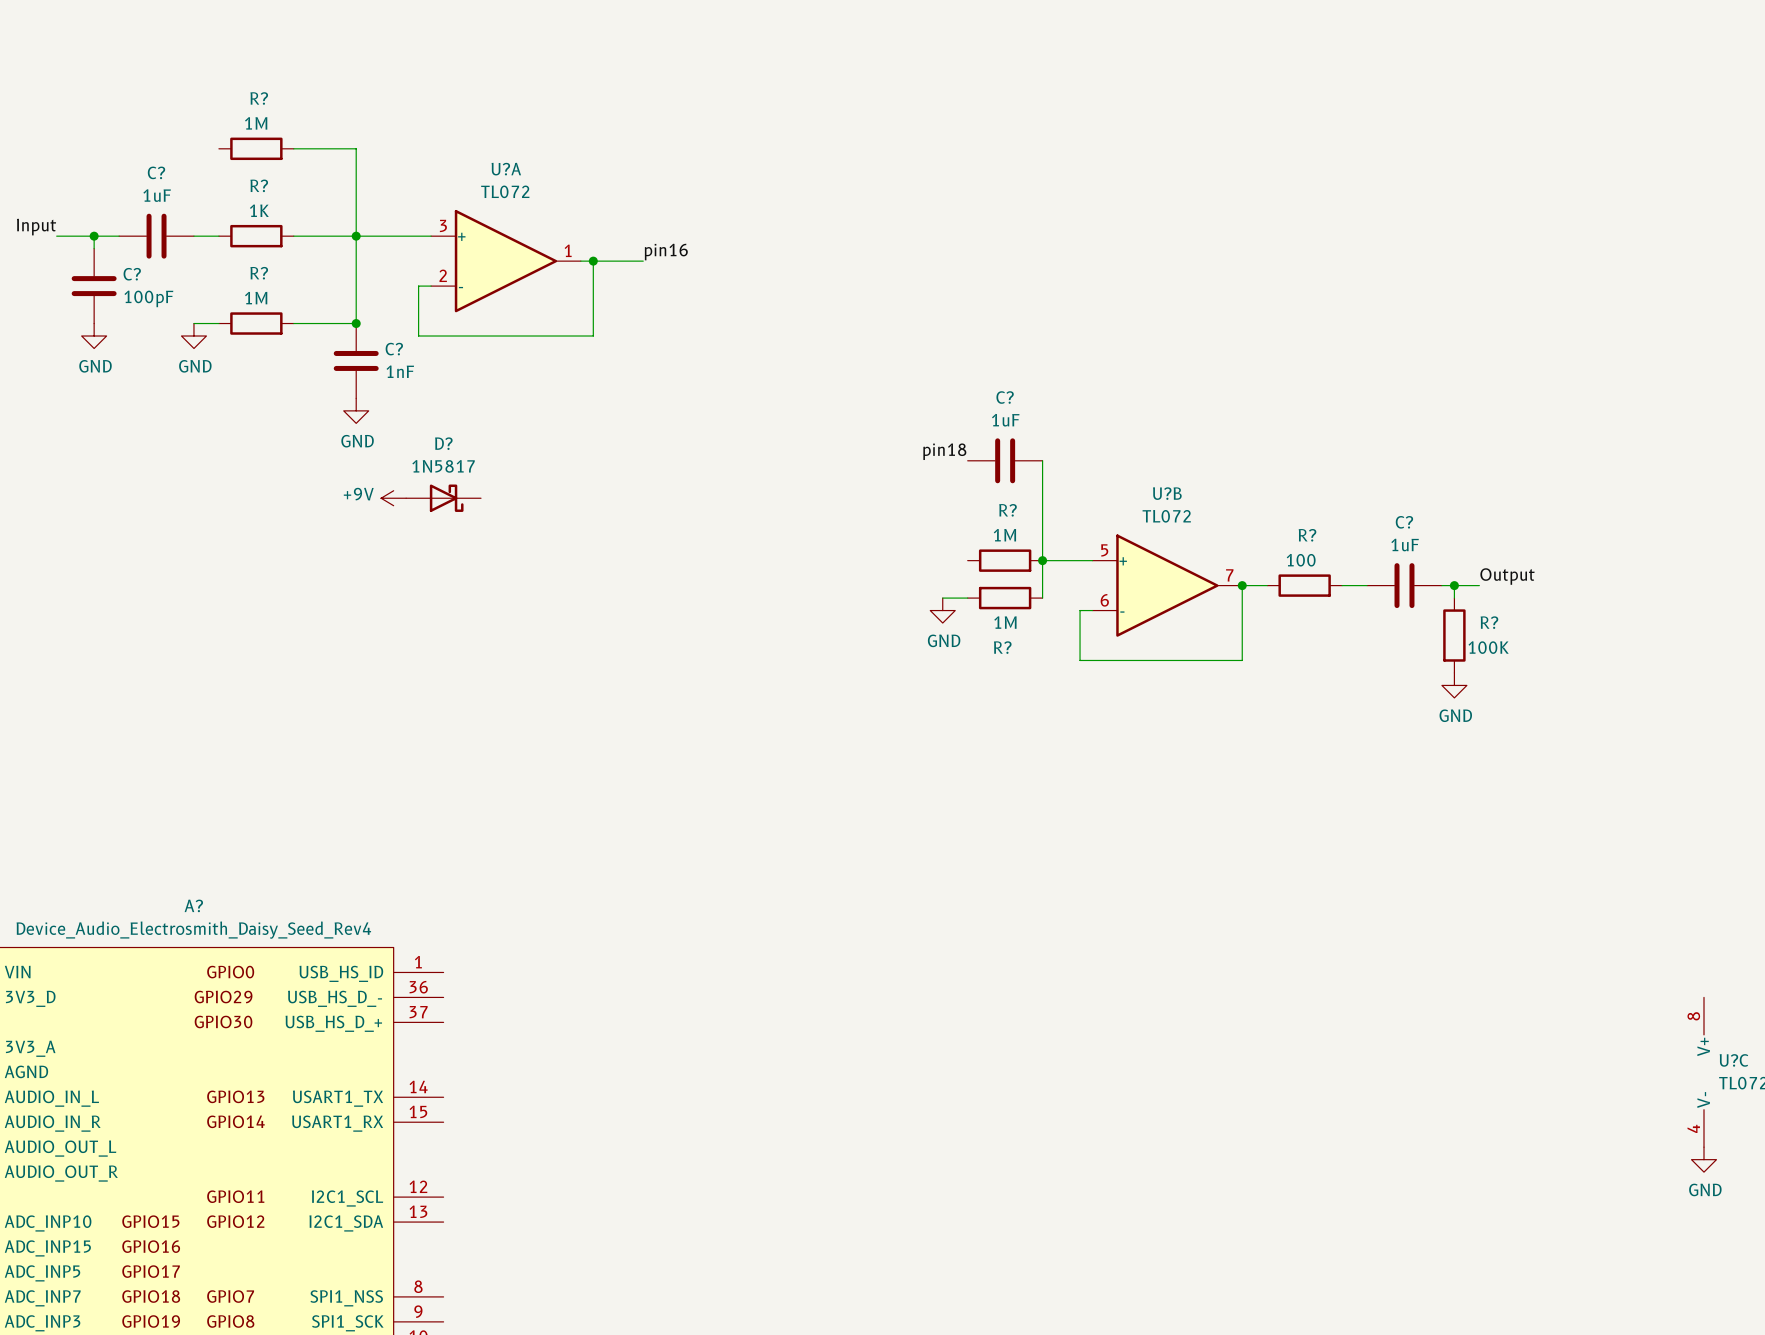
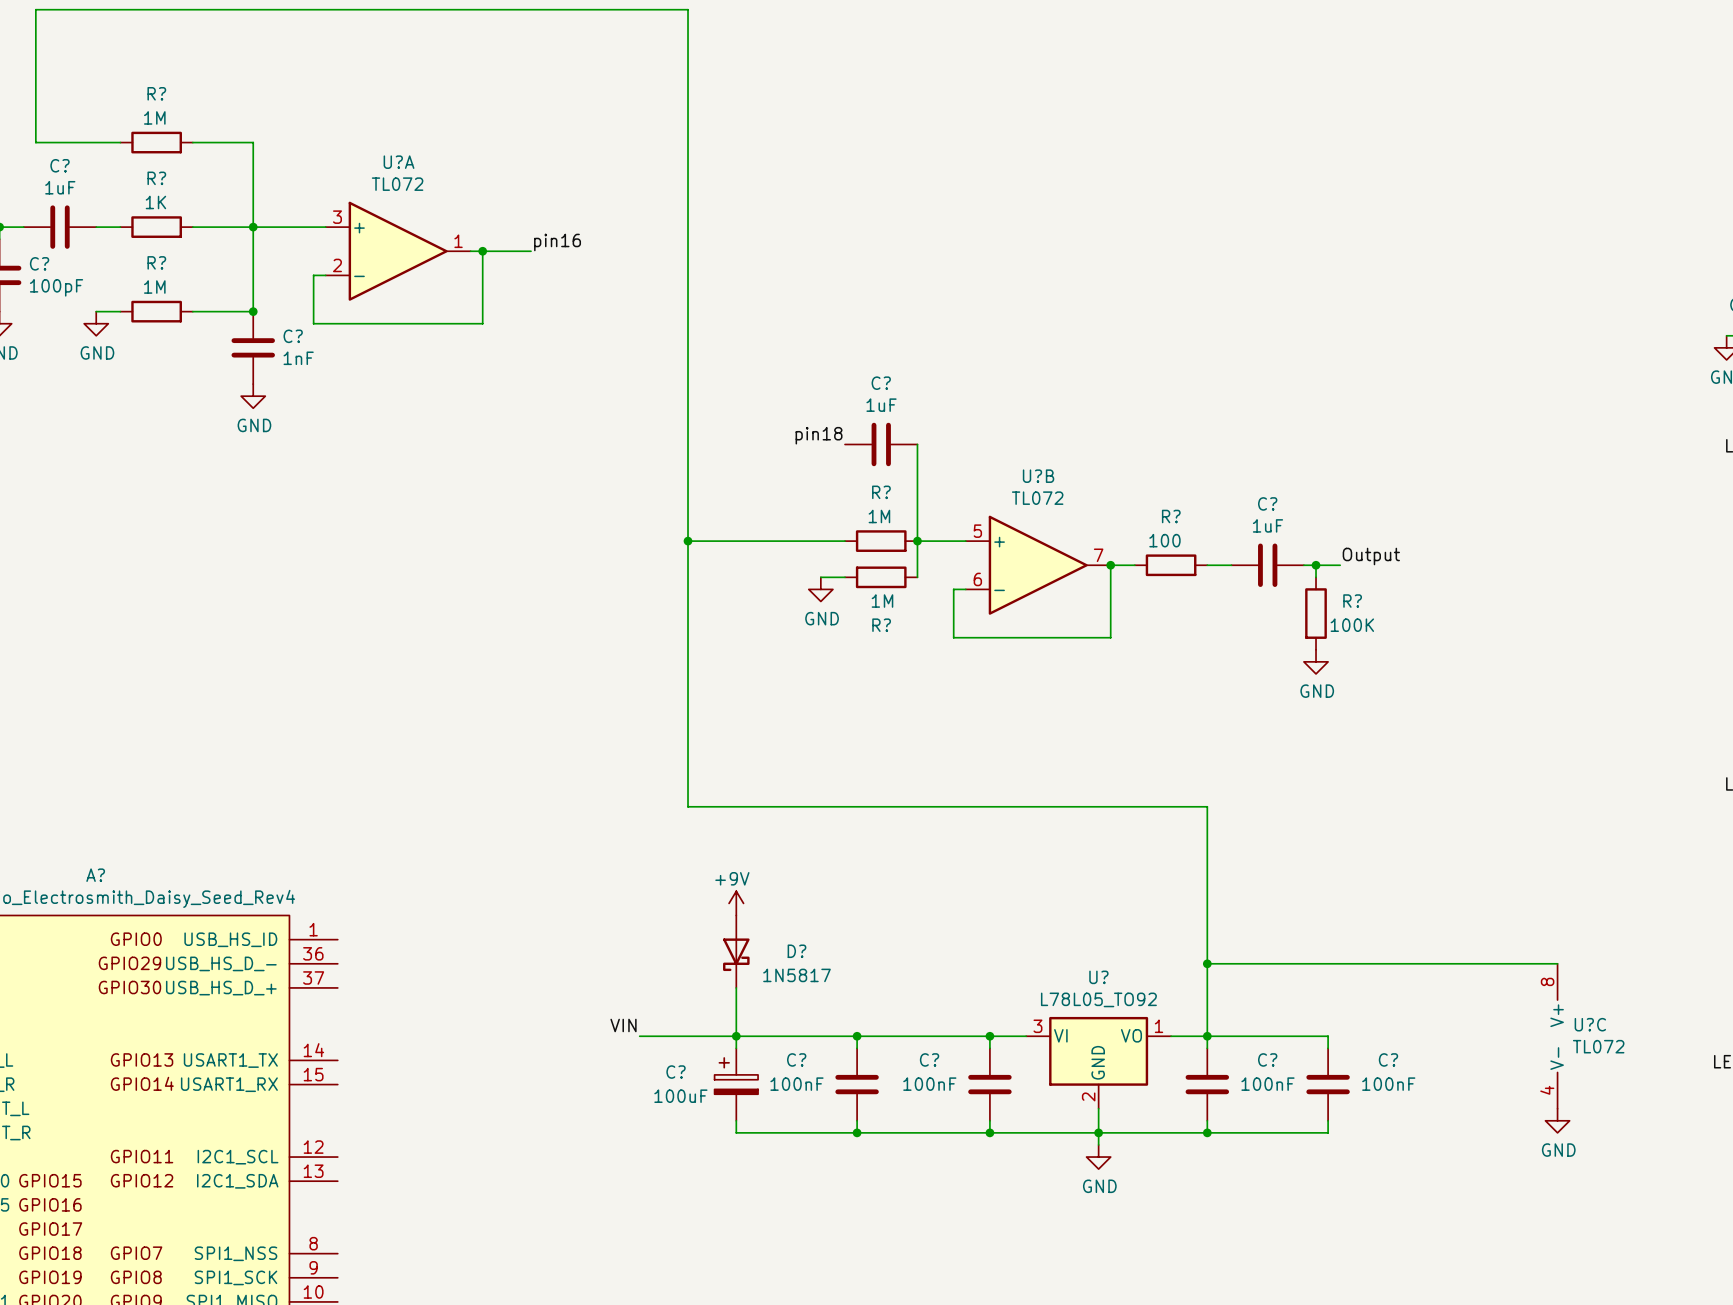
wire: none -> (120, 142) (35, 142) (35, 9) (688, 9) (688, 806) (1207, 806) (1207, 1048)
power symbol: +9V (393, 498) -> none
D?: 1N5817 (443, 498) -> none
wire: none -> (688, 541) (845, 541)
junction: none -> (688, 541)
power symbol: none -> +9V (736, 903)
D?: none -> 1N5817 (736, 951)
wire: none -> (1207, 963) (1557, 963)
junction: none -> (1207, 963)
wire: none -> (736, 987) (736, 1048)
label: none -> VIN (623, 1025)
wire: none -> (639, 1036) (1026, 1036)
junction: none -> (736, 1036)
wire: none -> (857, 1036) (857, 1048)
junction: none -> (857, 1036)
wire: none -> (989, 1036) (989, 1048)
junction: none -> (989, 1036)
wire: none -> (1171, 1036) (1328, 1036) (1328, 1048)
junction: none -> (1207, 1036)
U?: none -> L78L05_TO92 (1098, 1062)
C?: none -> 100uF (736, 1084)
C?: none -> 100nF (857, 1084)
C?: none -> 100nF (989, 1084)
C?: none -> 100nF (1207, 1084)
C?: none -> 100nF (1328, 1084)
wire: none -> (1098, 1108) (1098, 1144)
wire: none -> (736, 1120) (736, 1132) (1328, 1132) (1328, 1120)
wire: none -> (857, 1120) (857, 1132)
wire: none -> (989, 1120) (989, 1132)
wire: none -> (1207, 1120) (1207, 1132)
junction: none -> (857, 1132)
junction: none -> (989, 1132)
junction: none -> (1098, 1132)
junction: none -> (1207, 1132)
power symbol: none -> GND (1098, 1157)

